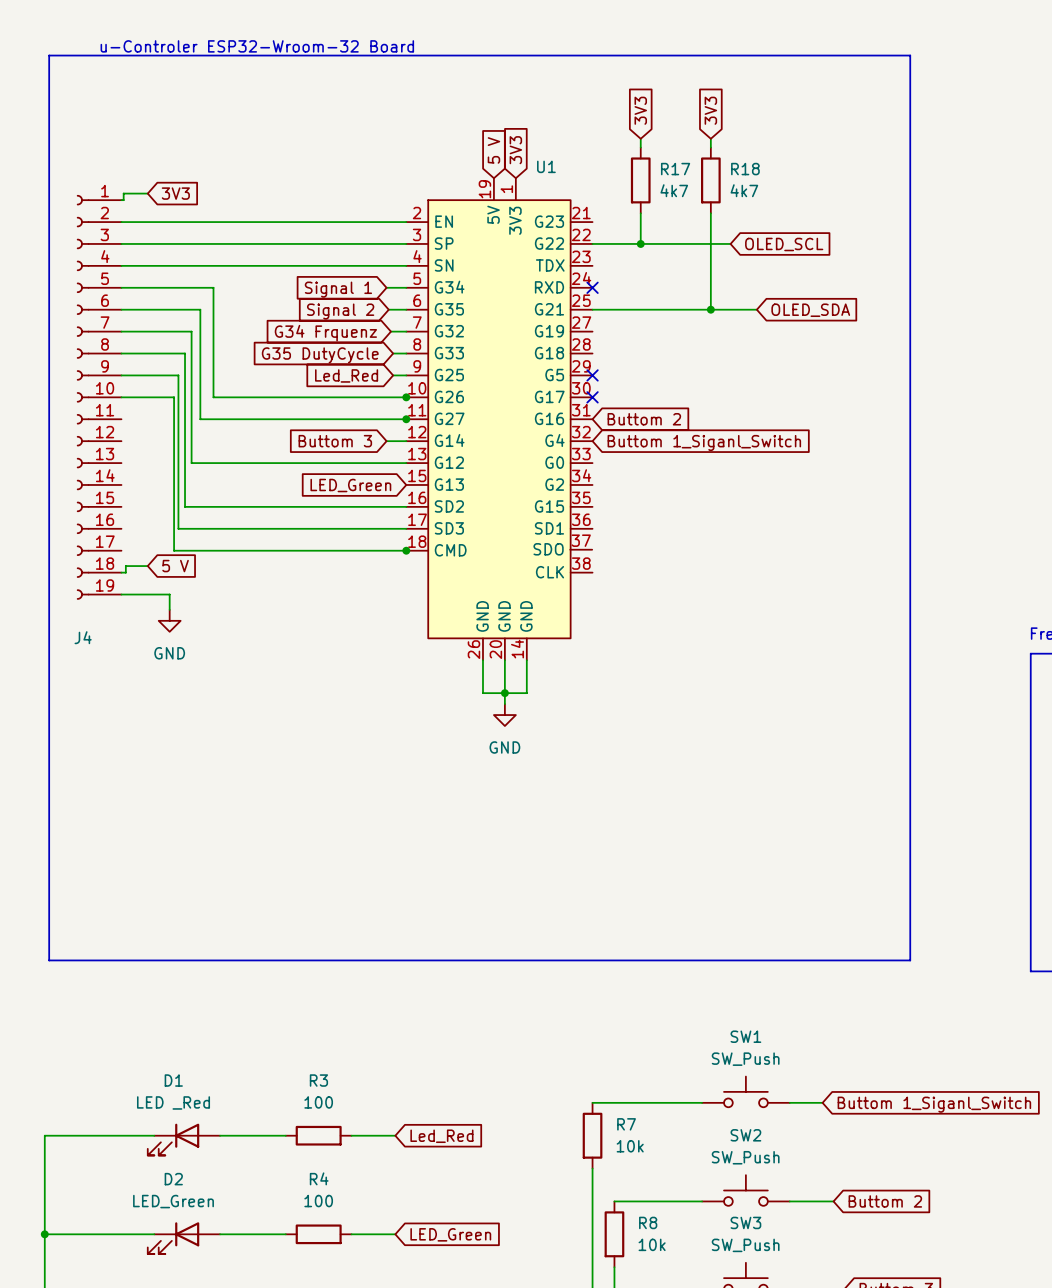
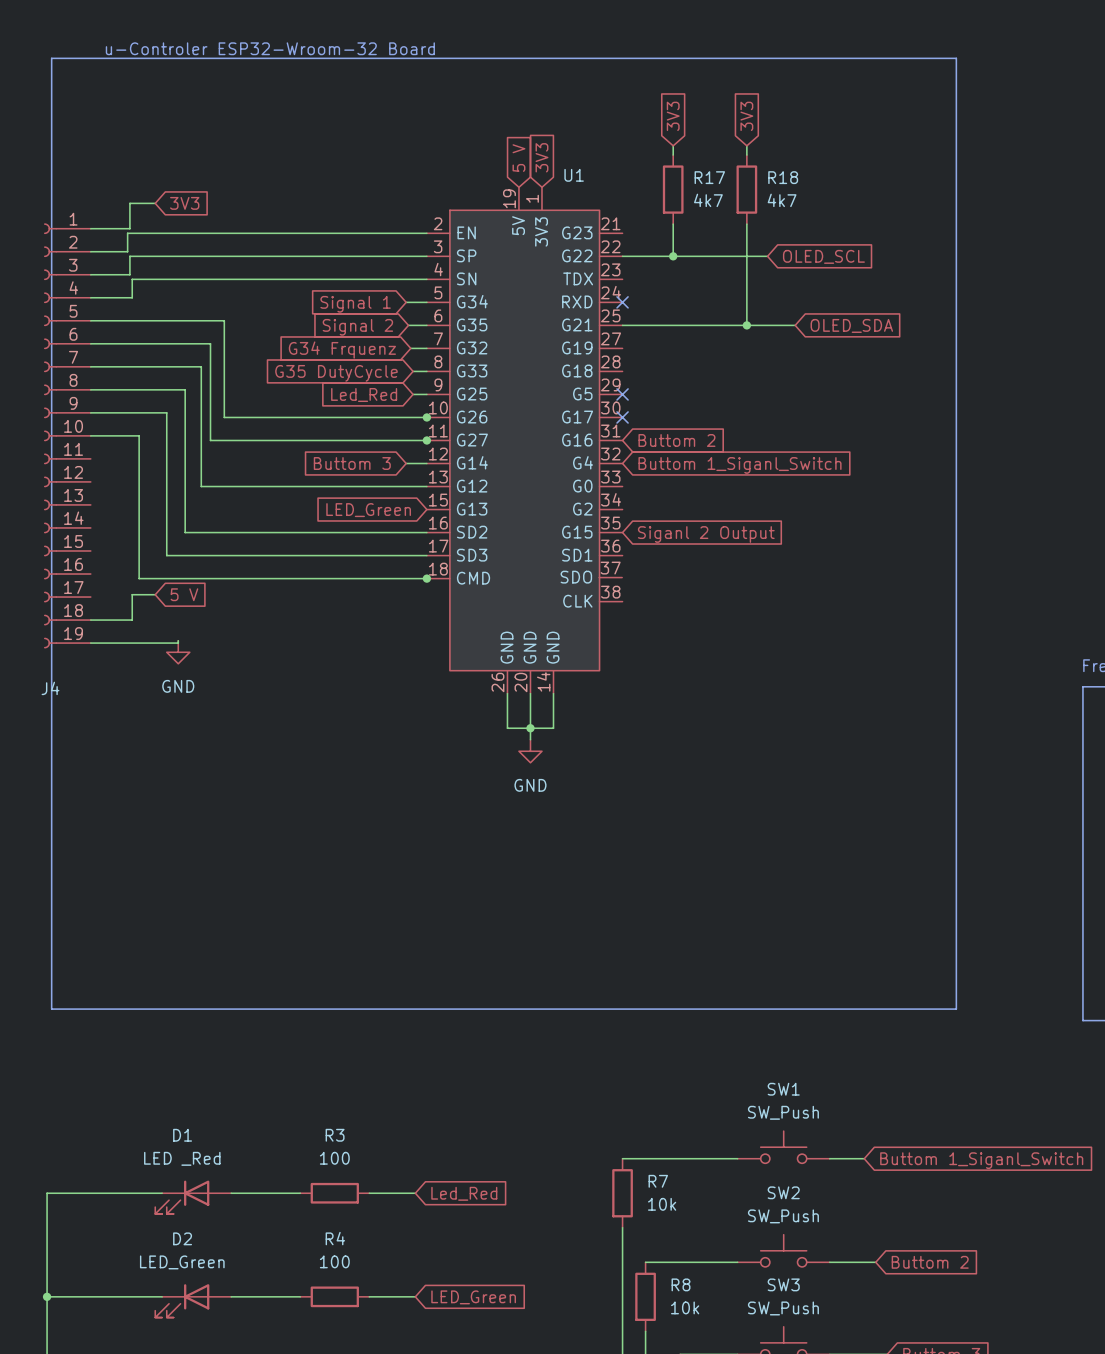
wire: (121, 200) (123, 200) -> (90, 228) (129, 228) (129, 210)
wire: none -> (127, 233) (127, 251) (90, 251)
wire: (121, 243) (123, 243) -> (90, 274) (129, 274) (129, 256)
wire: (121, 265) (125, 265) -> (90, 297) (132, 297) (132, 279)
wire: (121, 287) (213, 287) (213, 305) -> (90, 320) (224, 320)
wire: (121, 309) (200, 309) (200, 327) -> (90, 343) (210, 343)
wire: (121, 331) (191, 331) (191, 349) -> (90, 366) (201, 366)
wire: (121, 353) (185, 353) (185, 506) -> (90, 389) (185, 389) (185, 532) (194, 532)
wire: (121, 375) (178, 375) (178, 528) -> (90, 412) (166, 412) (166, 555) (187, 555)
J4 position: (99, 397) -> (67, 435)
wire: (121, 397) (174, 397) (174, 550) -> (90, 435) (139, 435) (139, 578) (182, 578)
global label: none -> Siganl 2 Output (706, 534)
wire: (121, 572) (125, 572) -> (90, 620) (132, 620) (132, 601)
wire: (121, 594) (169, 594) (169, 609) -> (90, 643) (178, 643) (178, 640)

